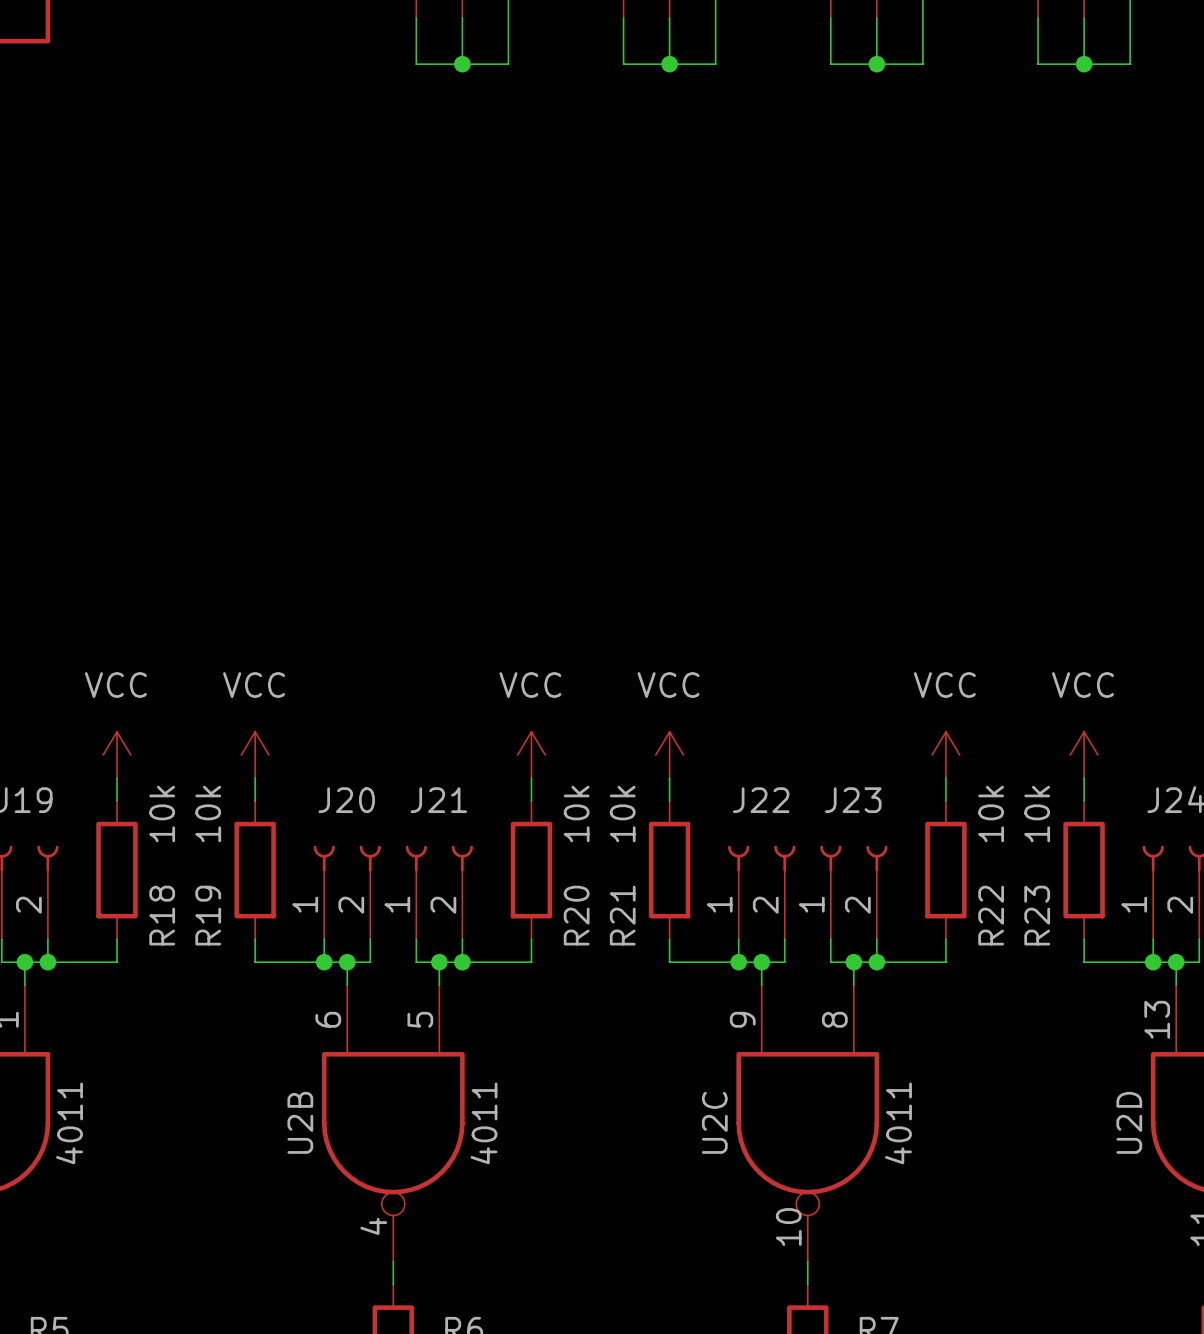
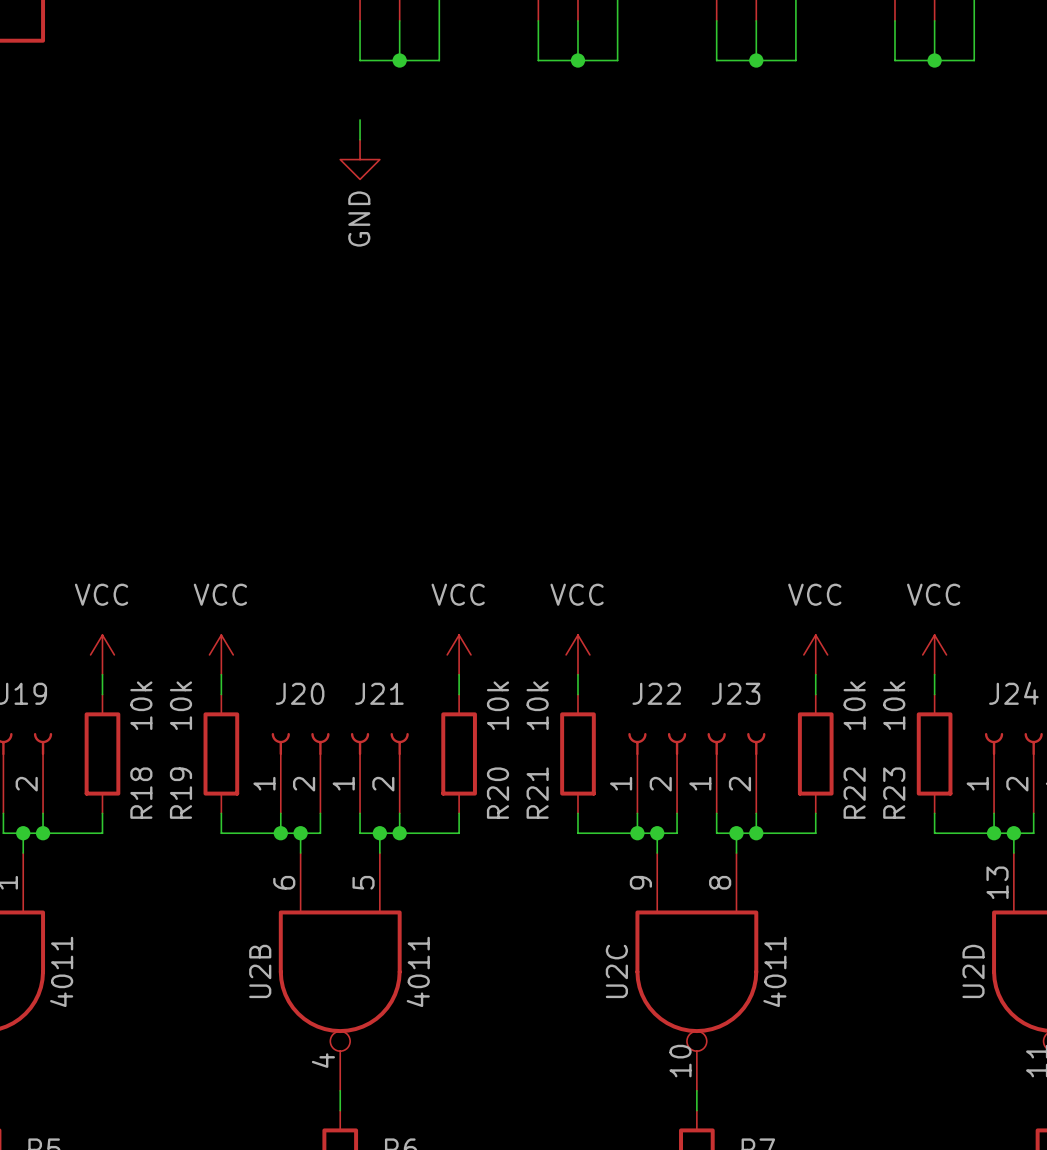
wire: none -> (360, 119) (360, 139)
power symbol: none -> GND (360, 159)

